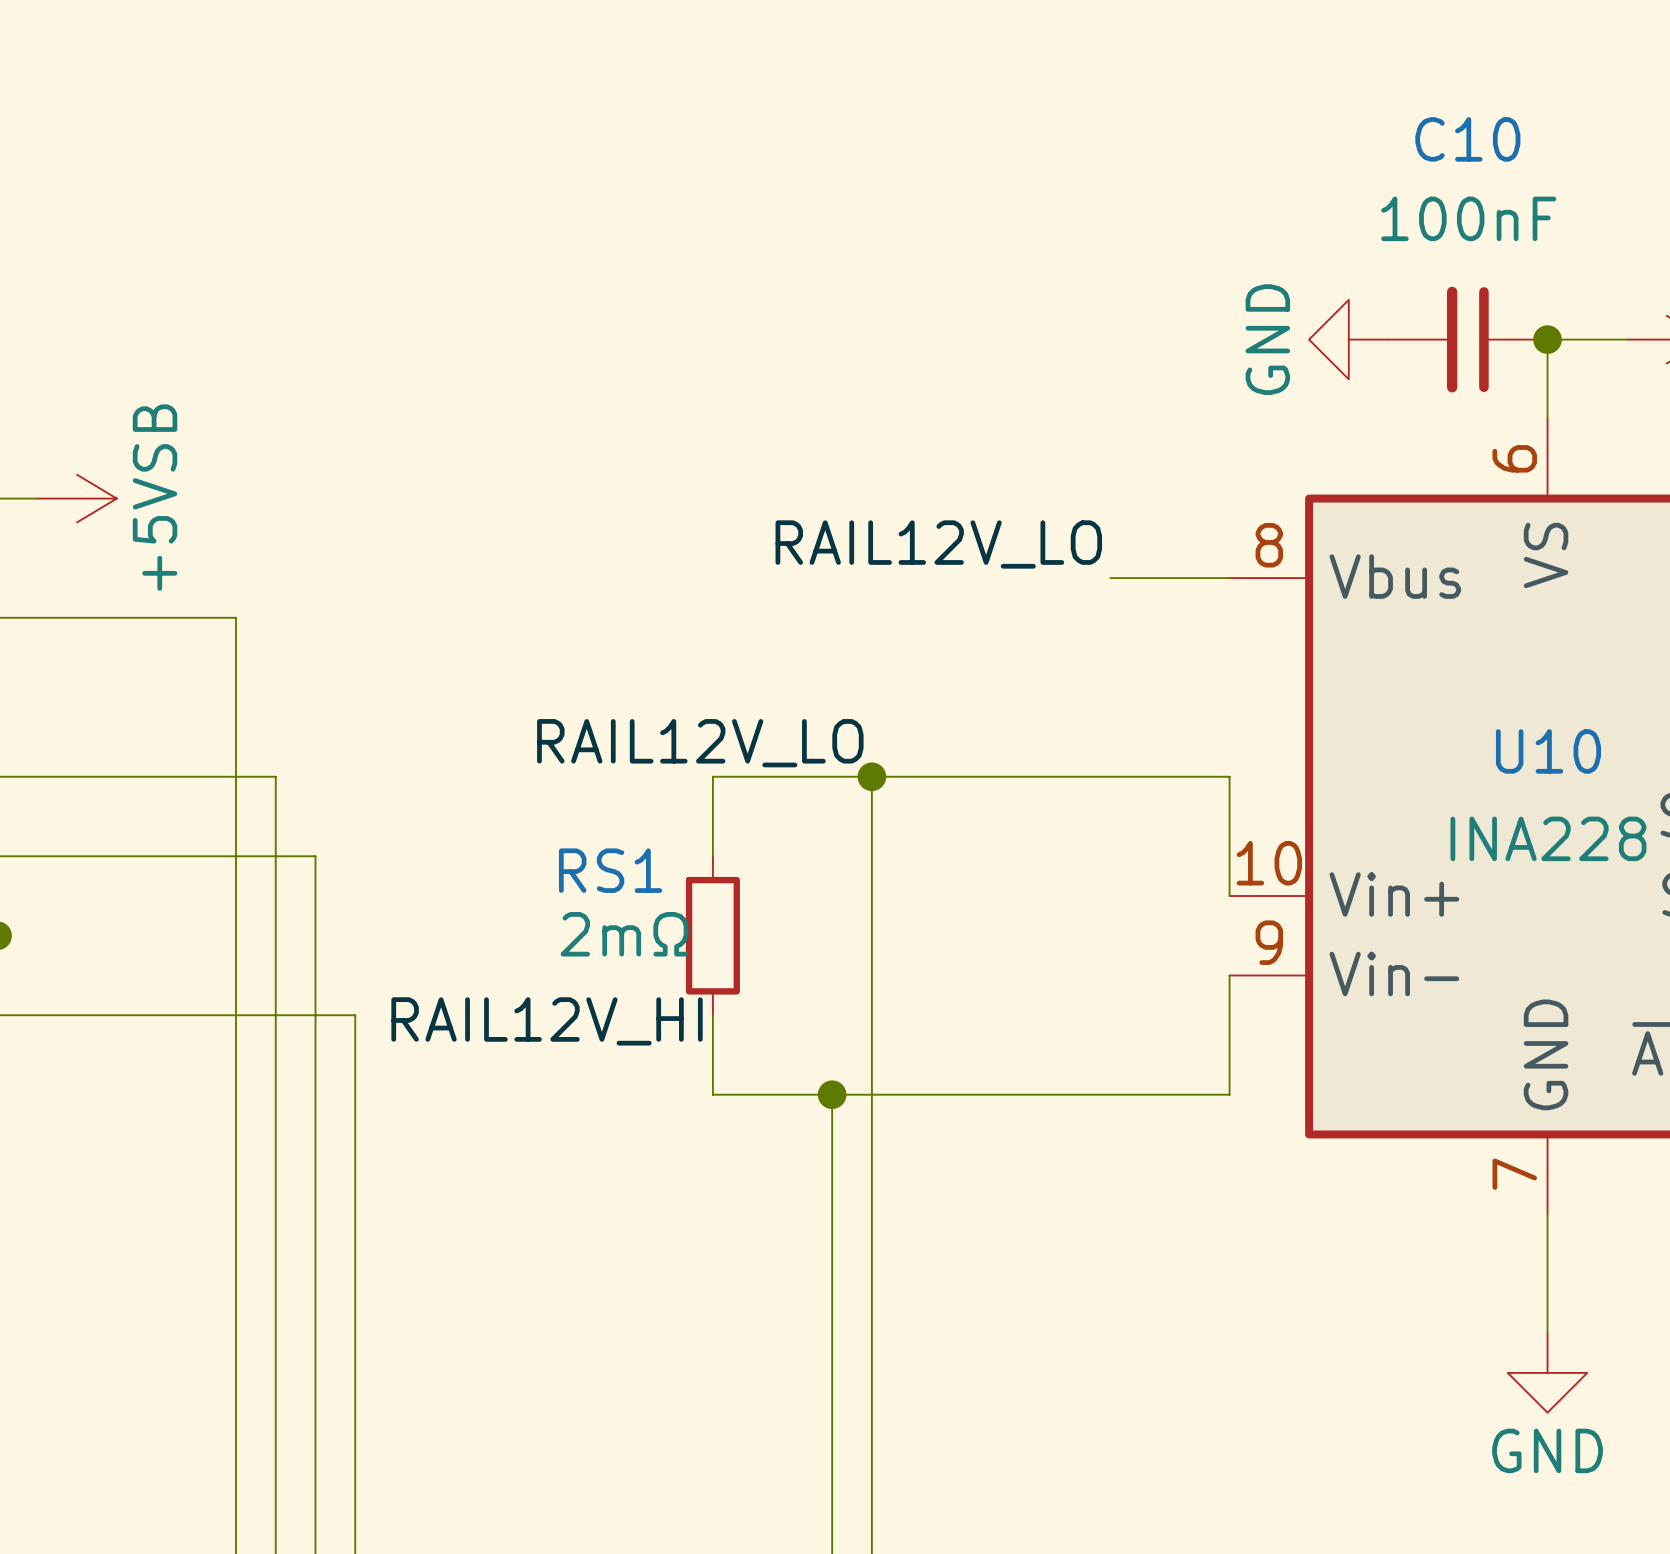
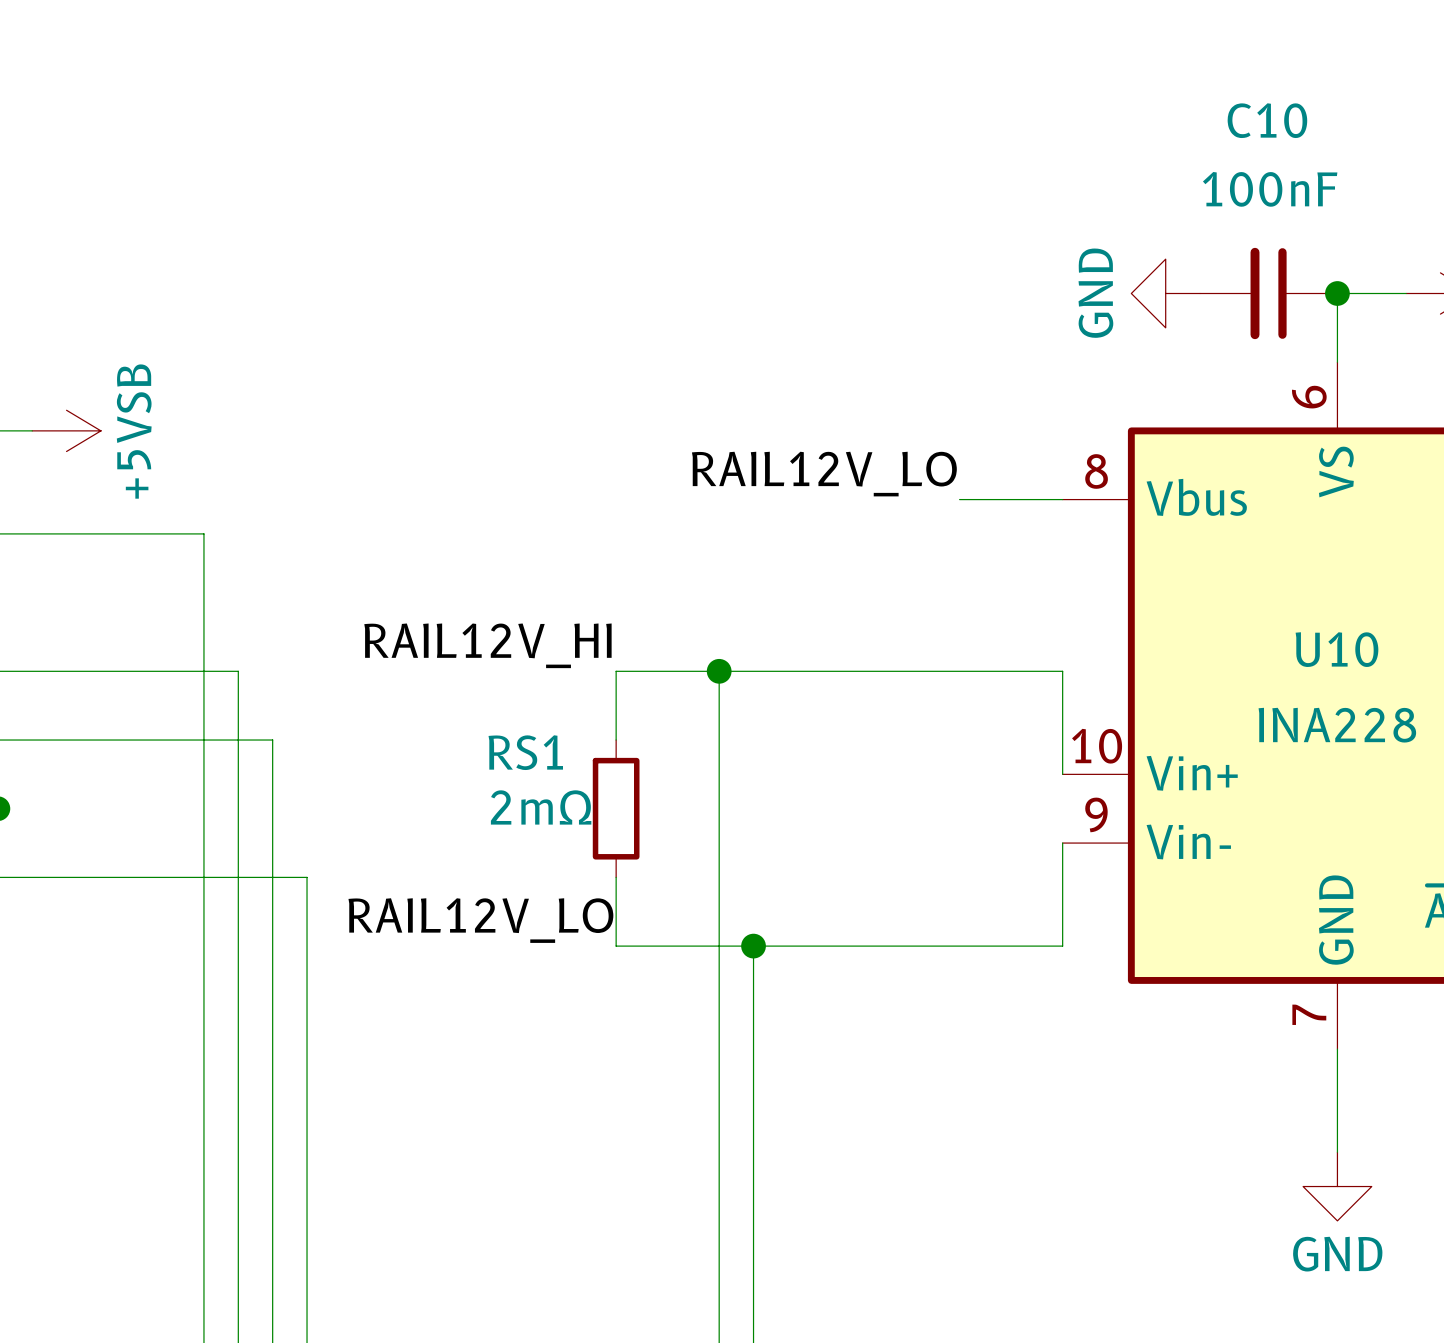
label position: RAIL12V_LO (700, 743) -> RAIL12V_LO (480, 920)
wire: (871, 776) (871, 1094) -> (719, 671) (719, 946)
junction position: (871, 776) -> (719, 671)
label position: RAIL12V_HI (547, 1021) -> RAIL12V_HI (487, 645)
junction position: (832, 1094) -> (753, 946)

